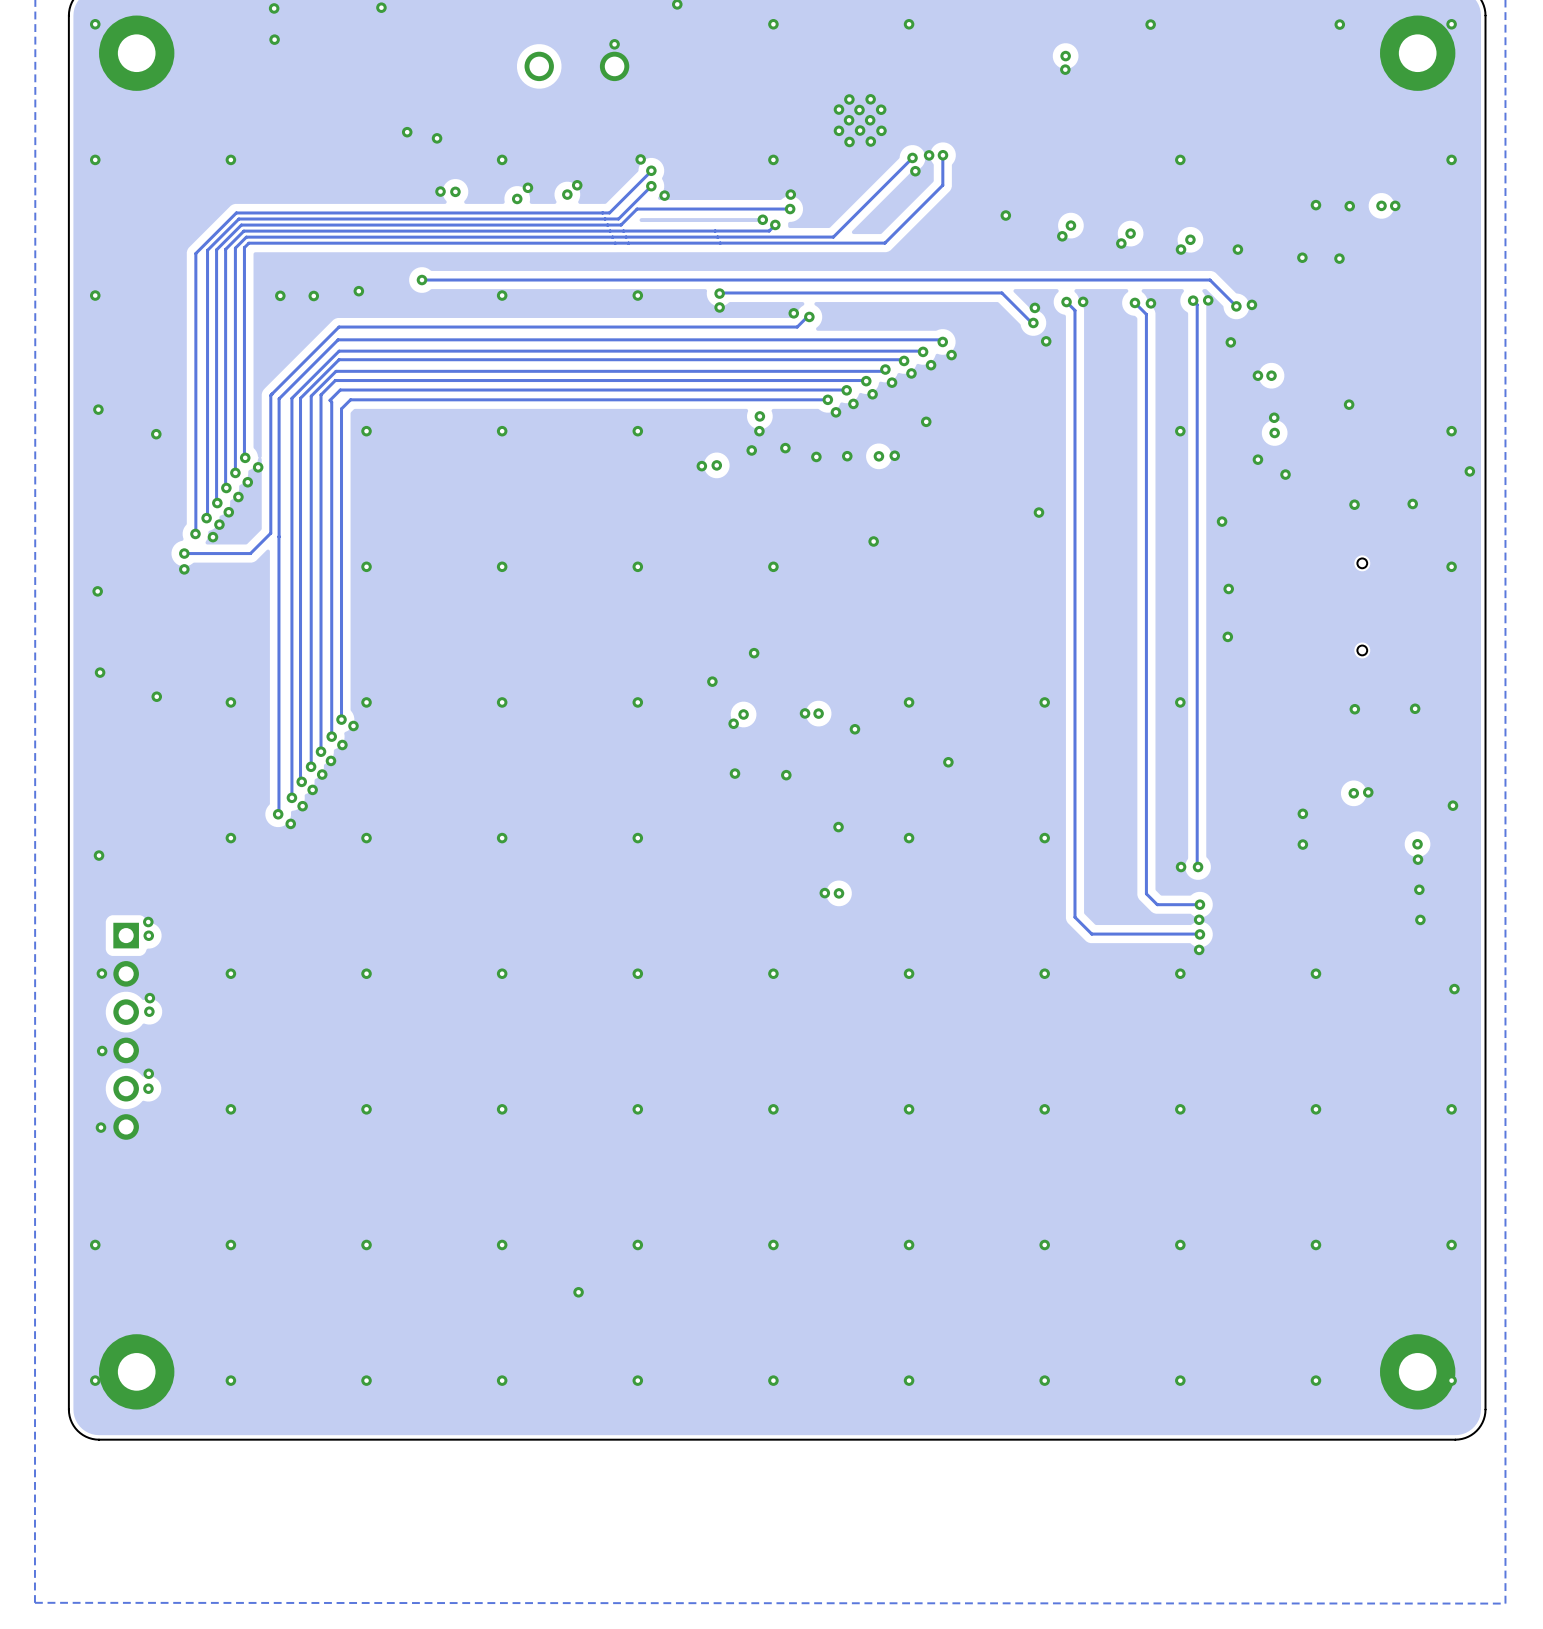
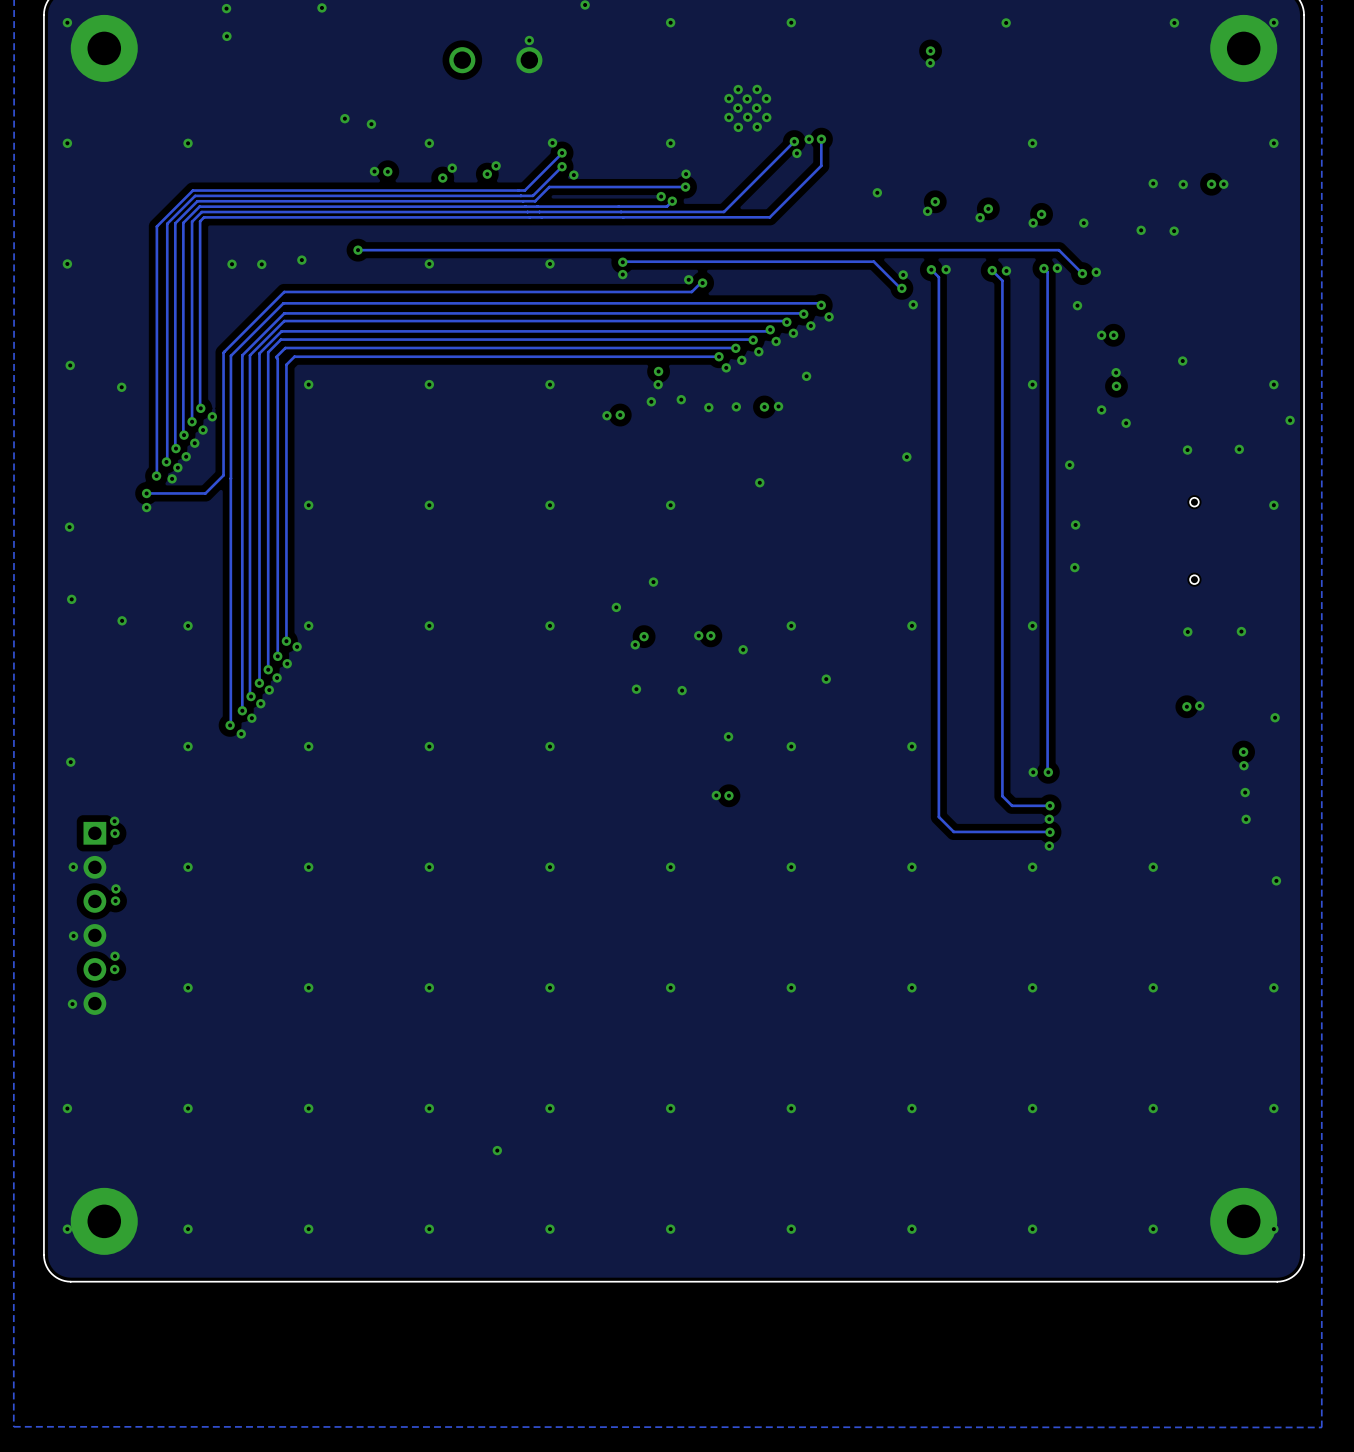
via: (1302, 813) -> none
via: (1302, 844) -> none

